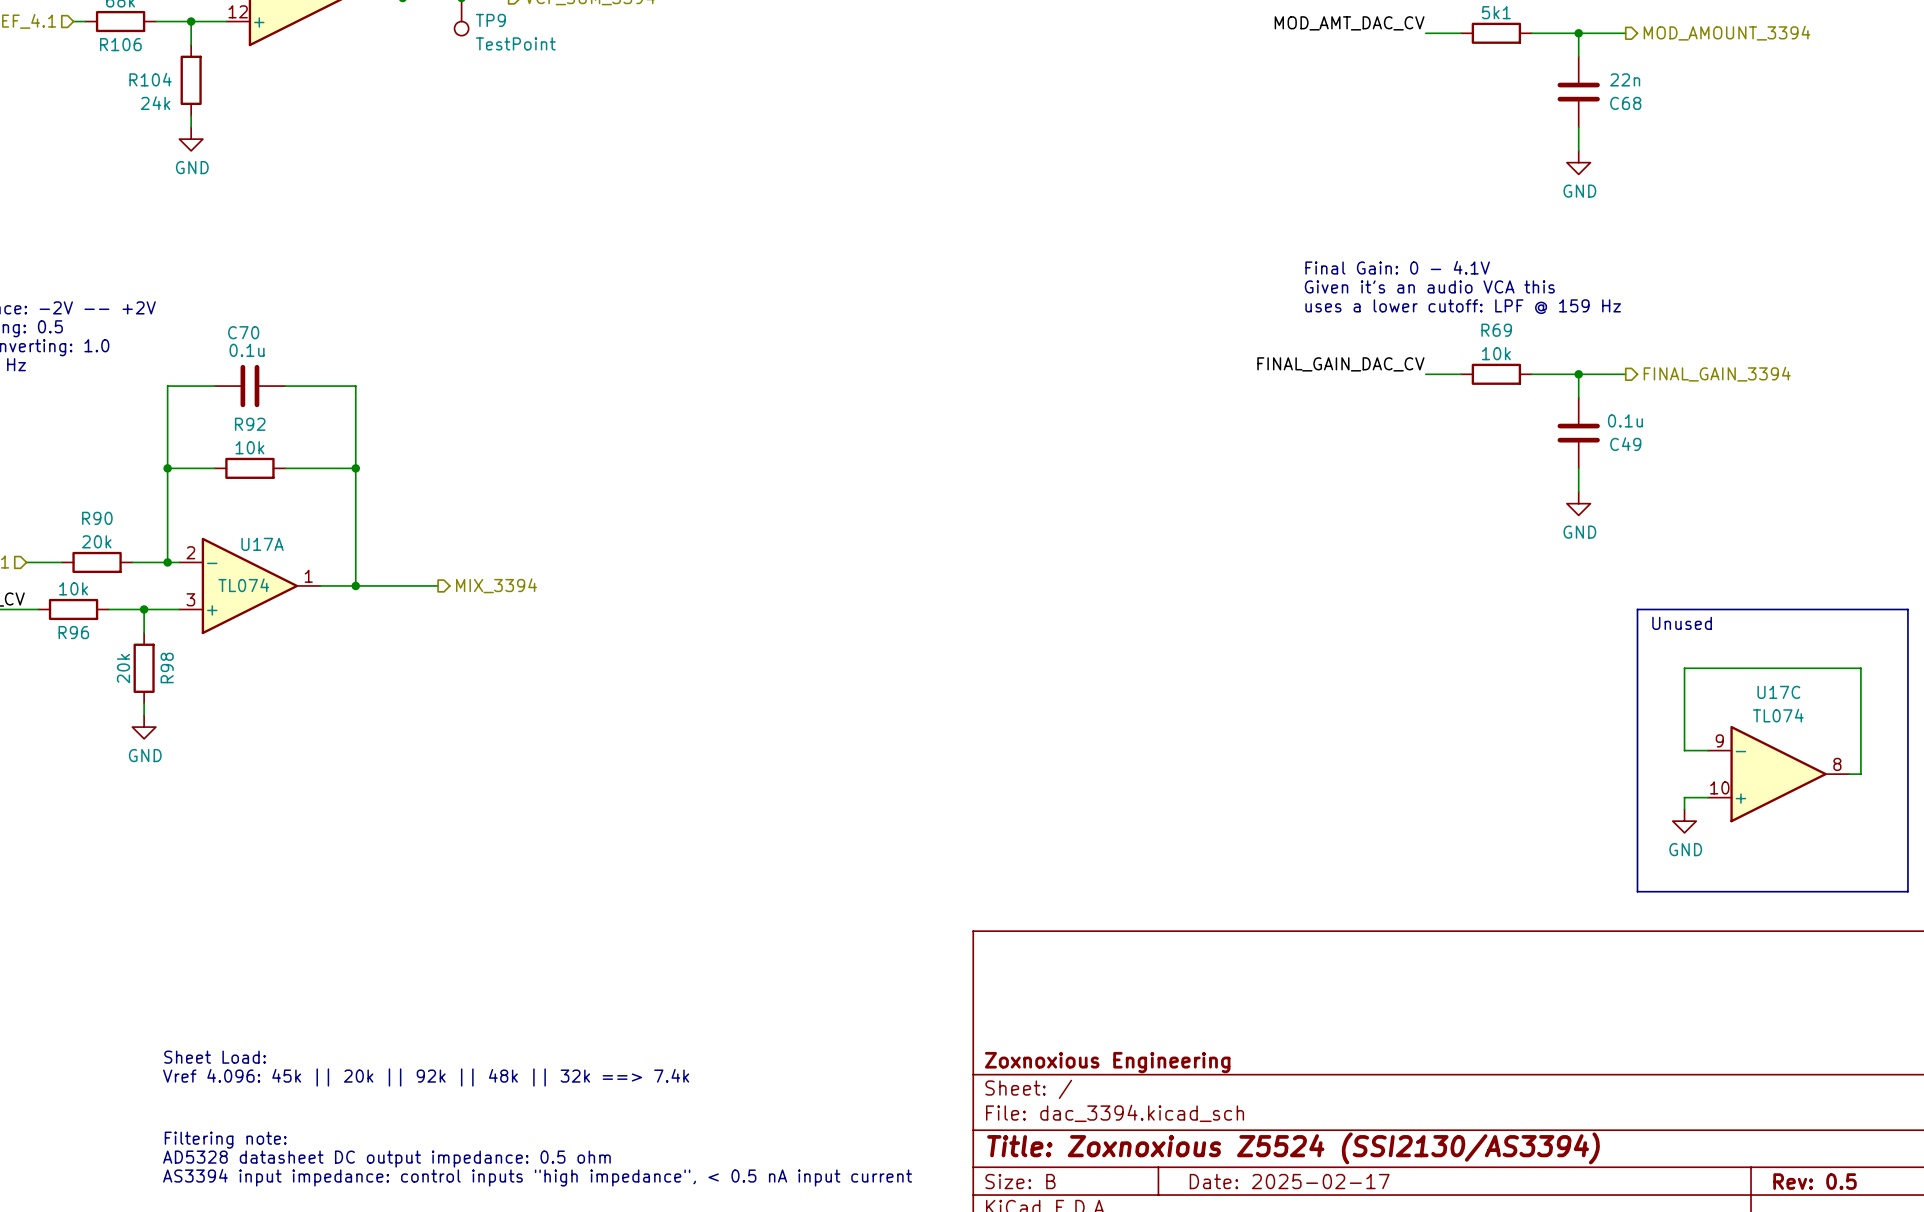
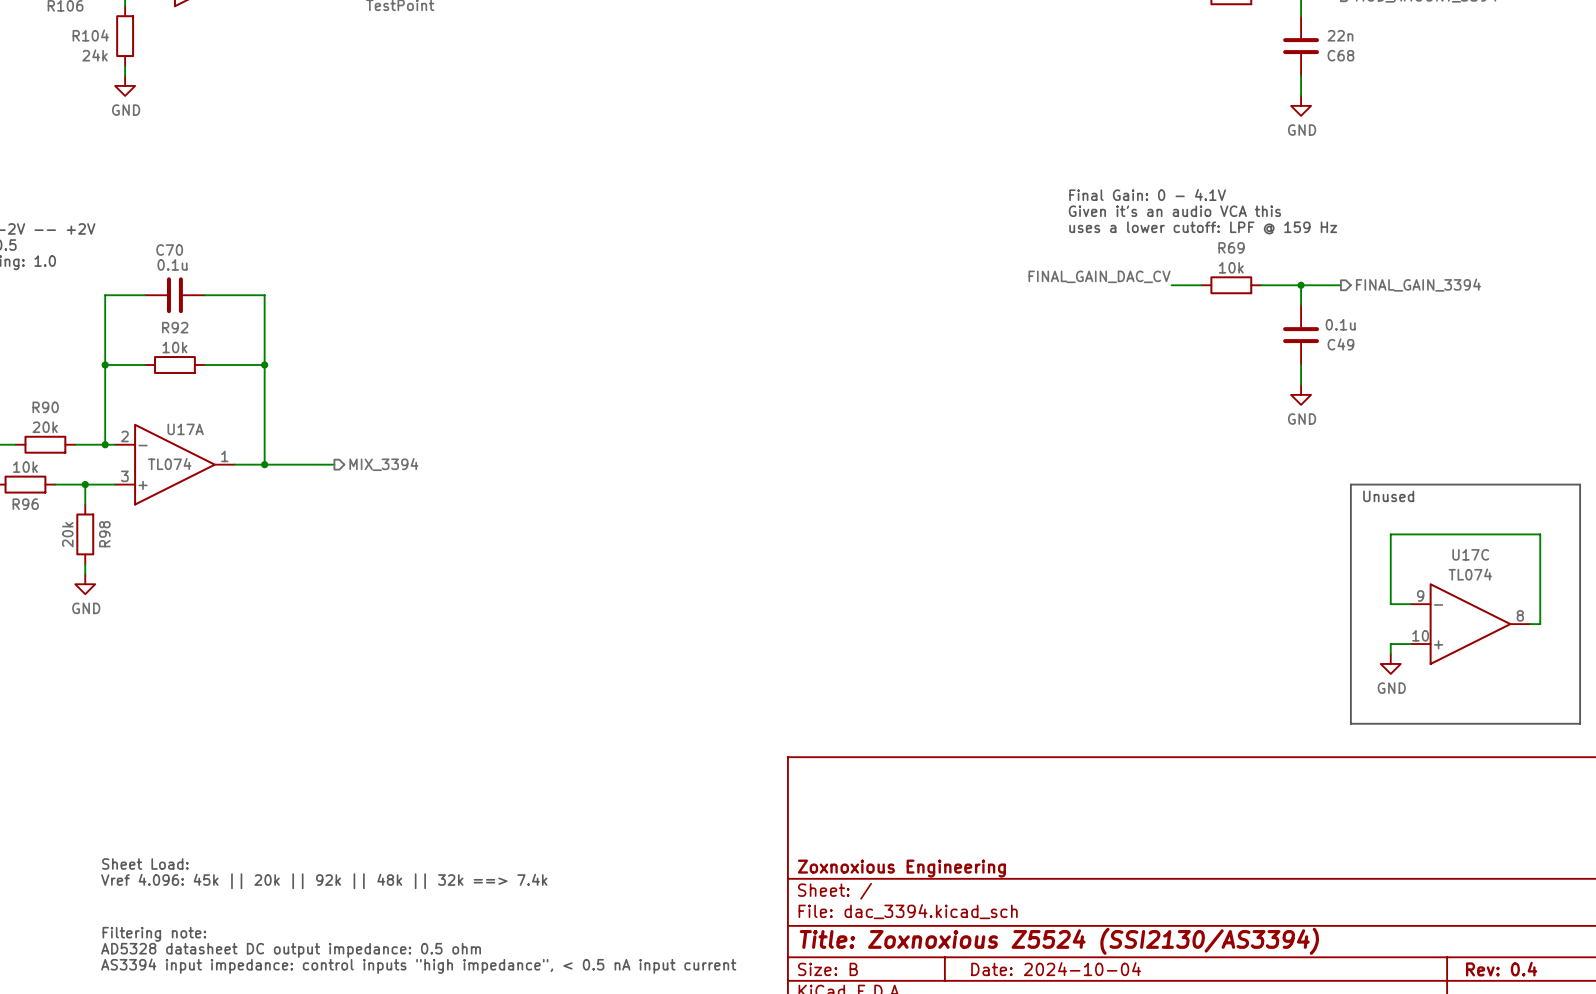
title block: Date: 2025-02-17 (1289, 1181) -> Date: 2024-10-04 (1056, 969)
title block: Rev: 0.5 (1815, 1181) -> Rev: 0.4 (1501, 969)

